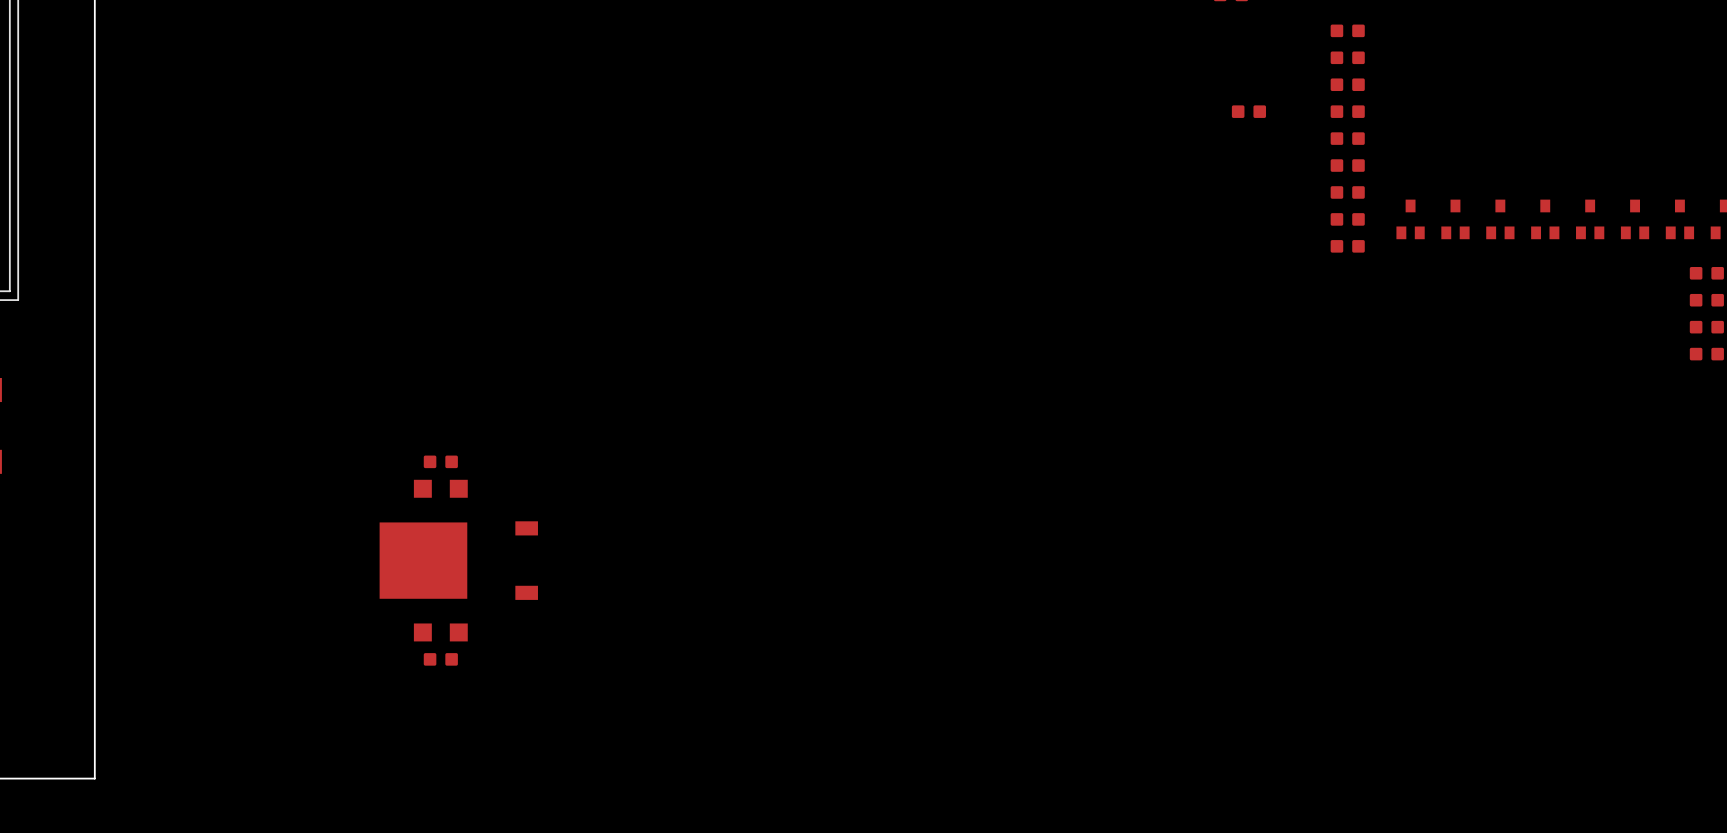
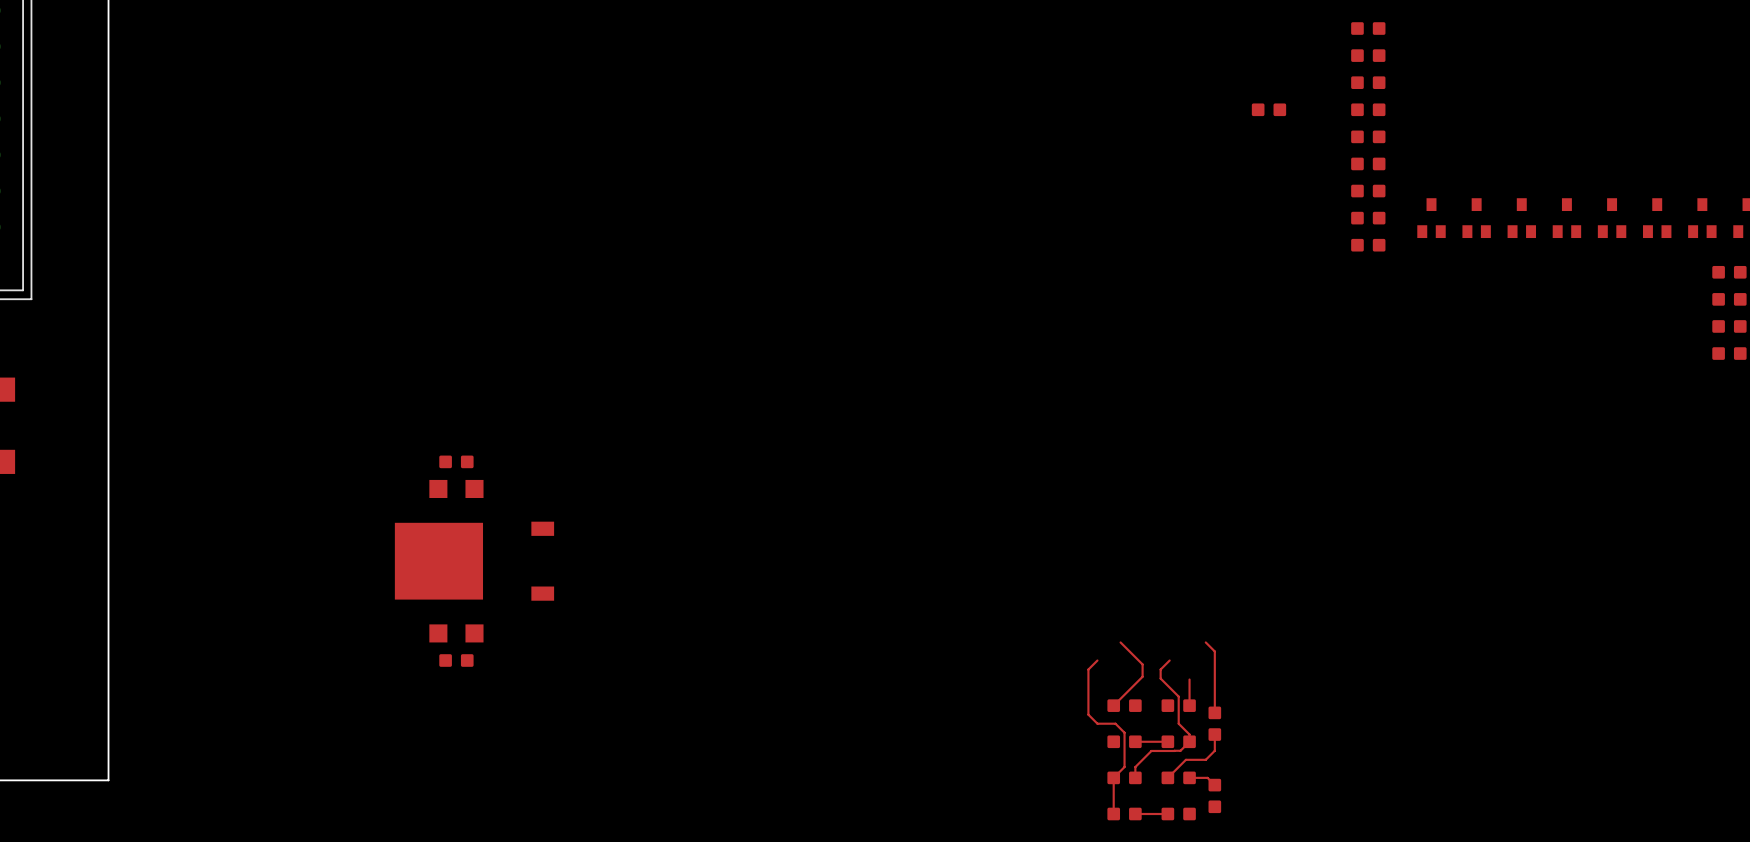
top track: none -> (1120, 642) (1142, 664) (1142, 676) (1113, 705)
top track: none -> (1205, 642) (1214, 651) (1214, 712)
top track: none -> (1097, 660) (1088, 669) (1088, 714) (1097, 723) (1115, 723) (1124, 732) (1124, 767) (1113, 777) (1113, 813)
top track: none -> (1169, 660) (1160, 669) (1160, 678) (1178, 696) (1178, 723) (1189, 734) (1189, 741) (1180, 750) (1174, 750)
top track: none -> (1189, 679) (1189, 705)
part: none -> (1124, 705)
part: none -> (1178, 705)
part: none -> (1214, 723)
top track: none -> (1214, 734) (1214, 750) (1205, 759) (1185, 759) (1167, 777)
part: none -> (1124, 741)
top track: none -> (1167, 741) (1135, 741)
part: none -> (1178, 741)
top track: none -> (1174, 750) (1151, 750) (1135, 767) (1135, 777)
part: none -> (1124, 777)
part: none -> (1178, 777)
top track: none -> (1189, 777) (1207, 777) (1214, 785)
part: none -> (1214, 795)
part: none -> (1124, 813)
top track: none -> (1167, 813) (1135, 813)
part: none -> (1178, 813)

